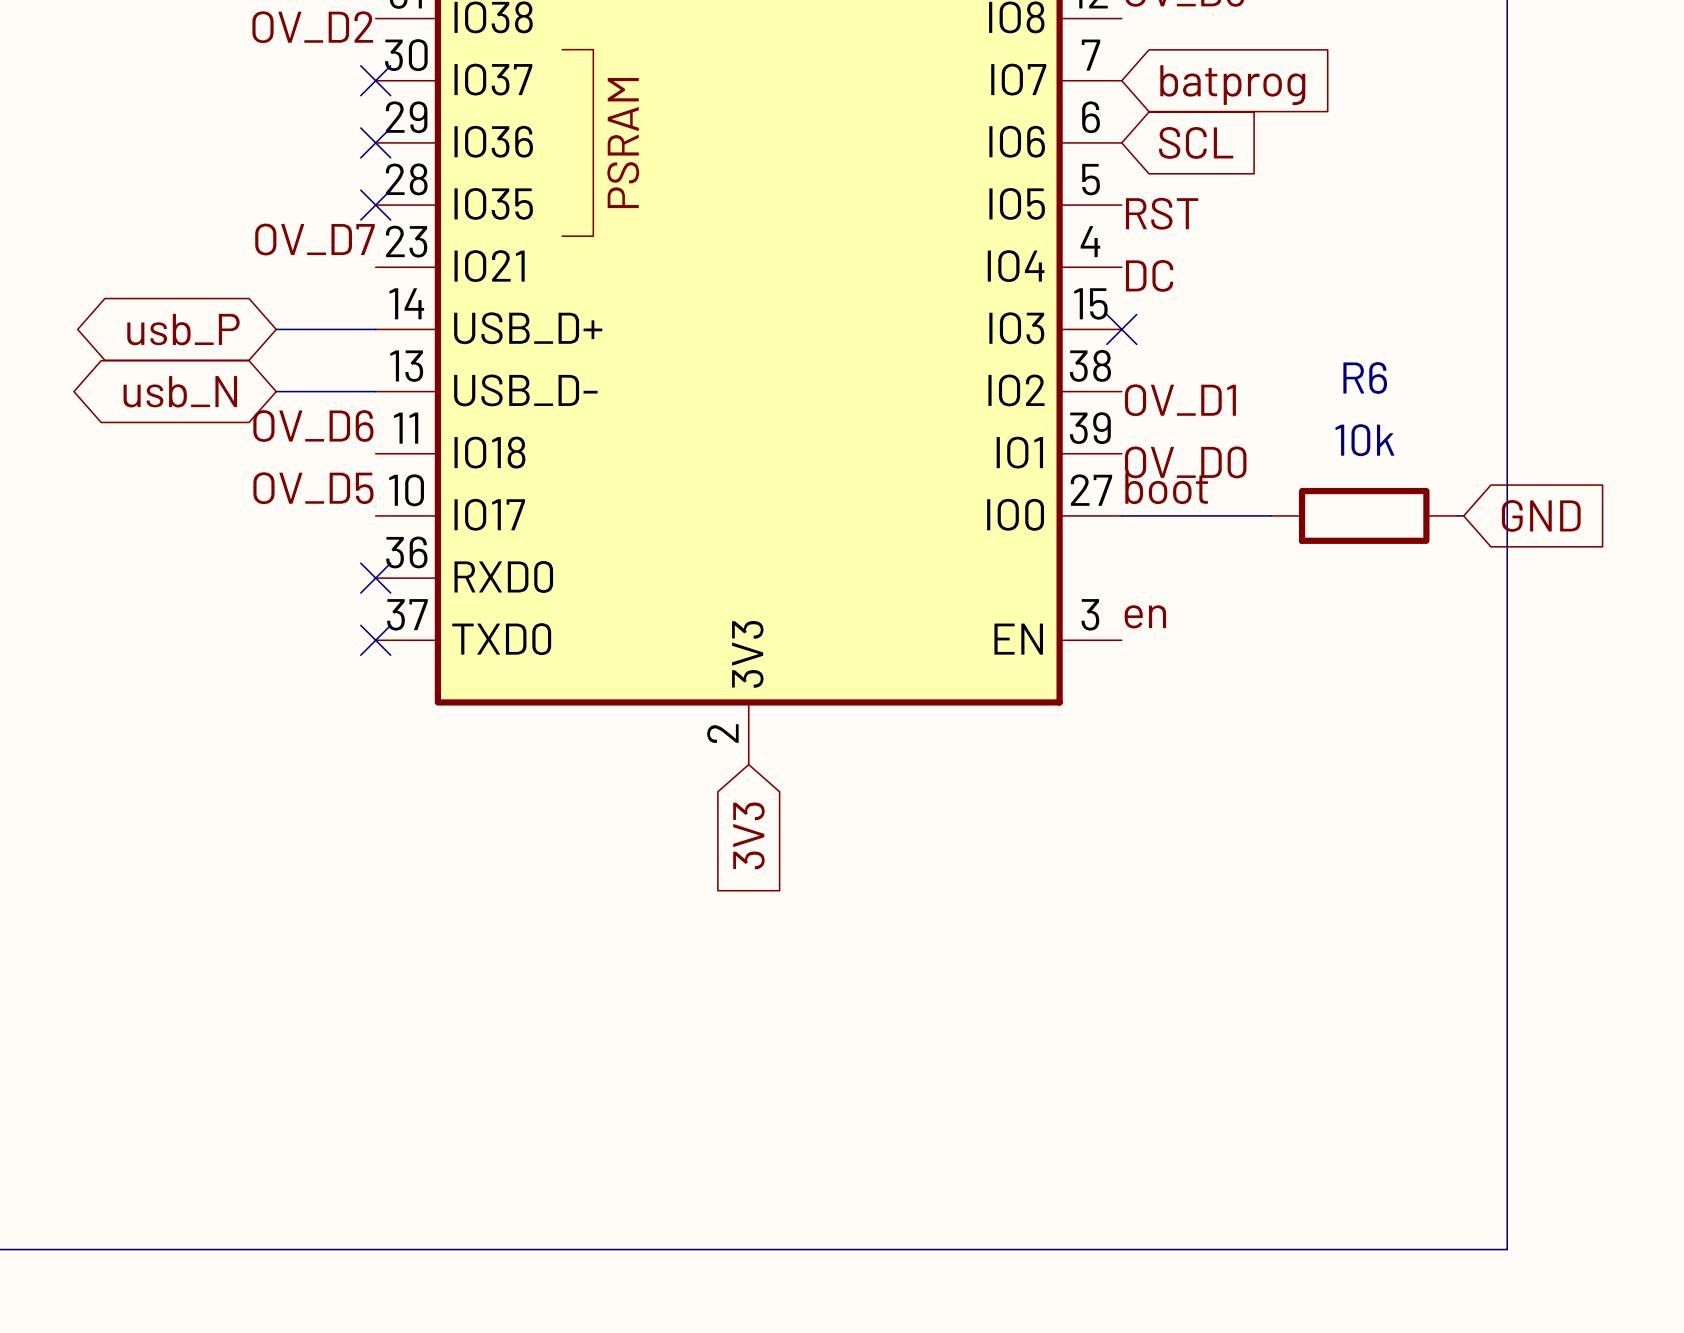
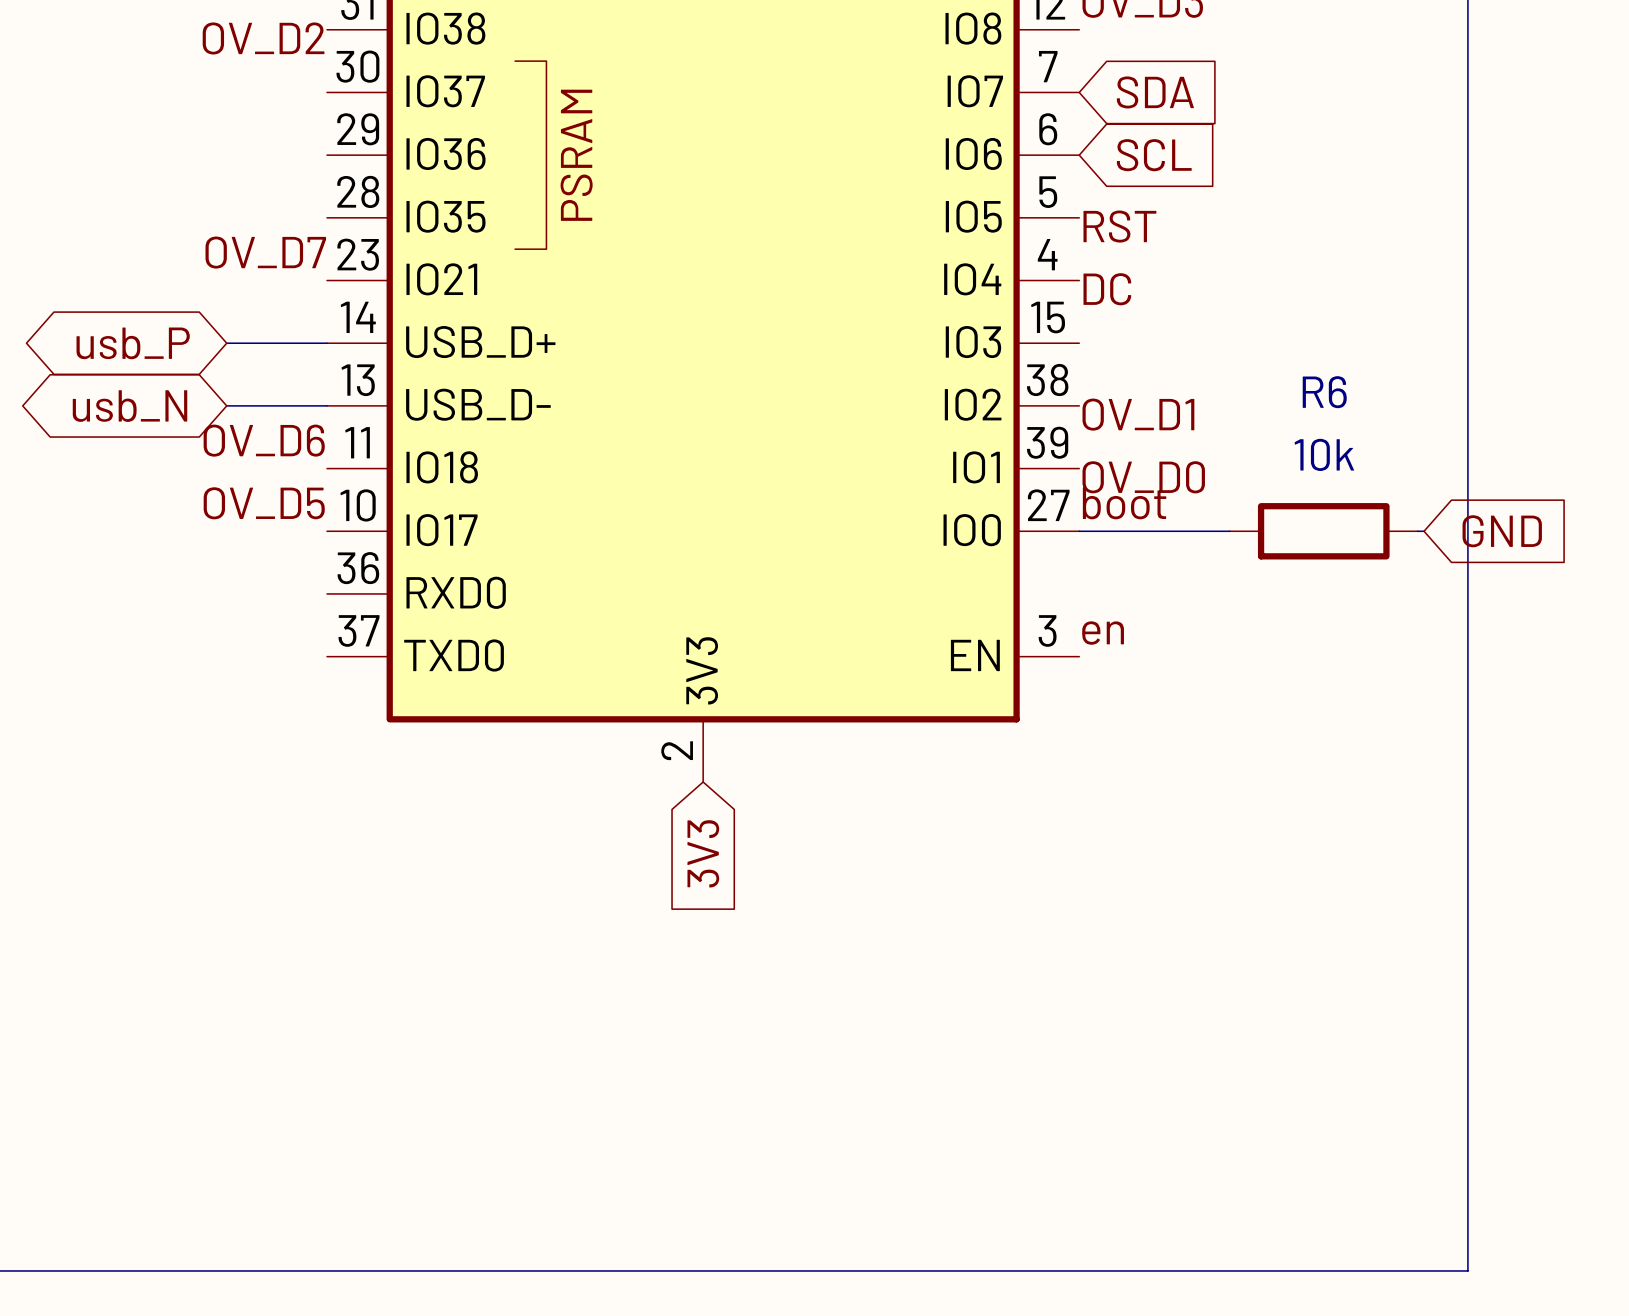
no-connect mark: (375, 80) -> none
global label: batprog (1232, 85) -> SDA (1155, 92)
no-connect mark: (375, 142) -> none
no-connect mark: (375, 205) -> none
no-connect mark: (1121, 329) -> none
no-connect mark: (375, 578) -> none
no-connect mark: (375, 640) -> none

